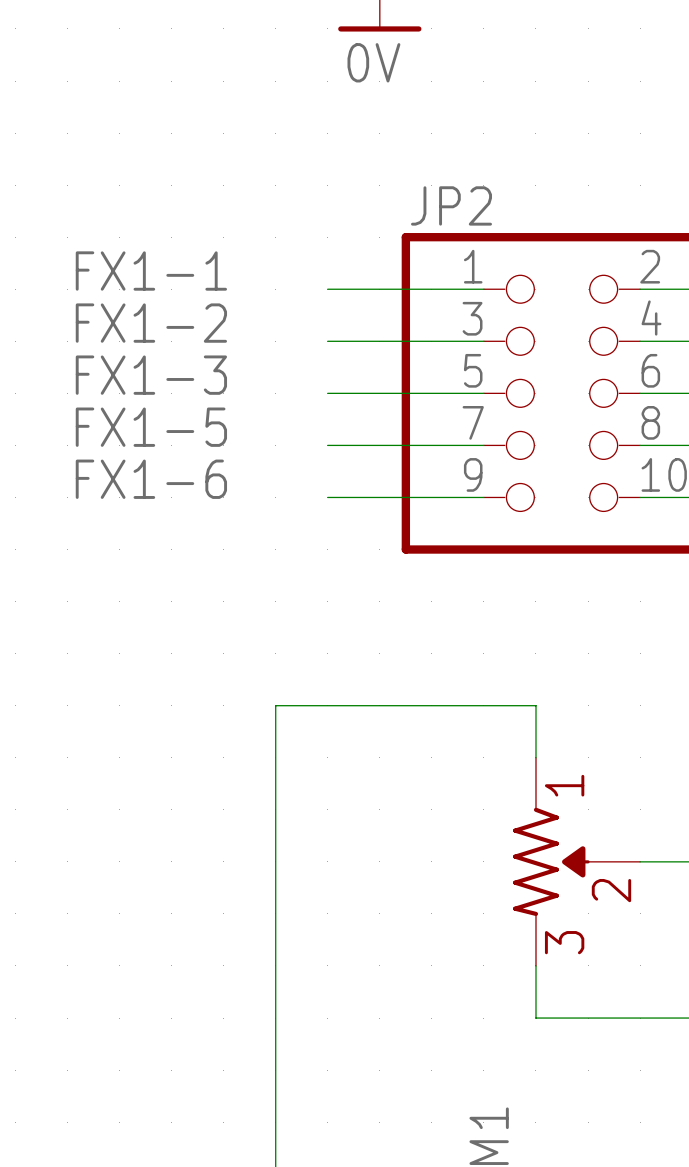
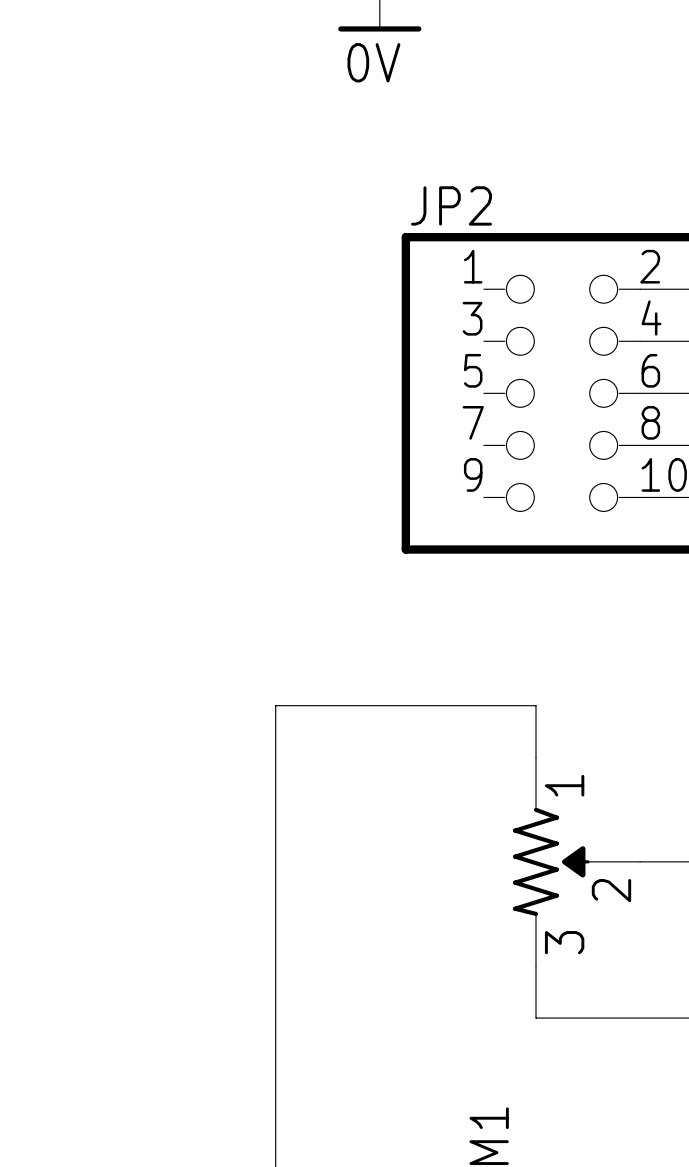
label: FX1-1 (151, 271) -> none
wire: (327, 289) (483, 289) -> none
label: FX1-2 (151, 323) -> none
wire: (327, 341) (483, 341) -> none
label: FX1-3 (151, 375) -> none
wire: (327, 393) (483, 393) -> none
label: FX1-5 (151, 427) -> none
wire: (327, 445) (483, 445) -> none
label: FX1-6 (151, 479) -> none
wire: (327, 497) (483, 497) -> none

